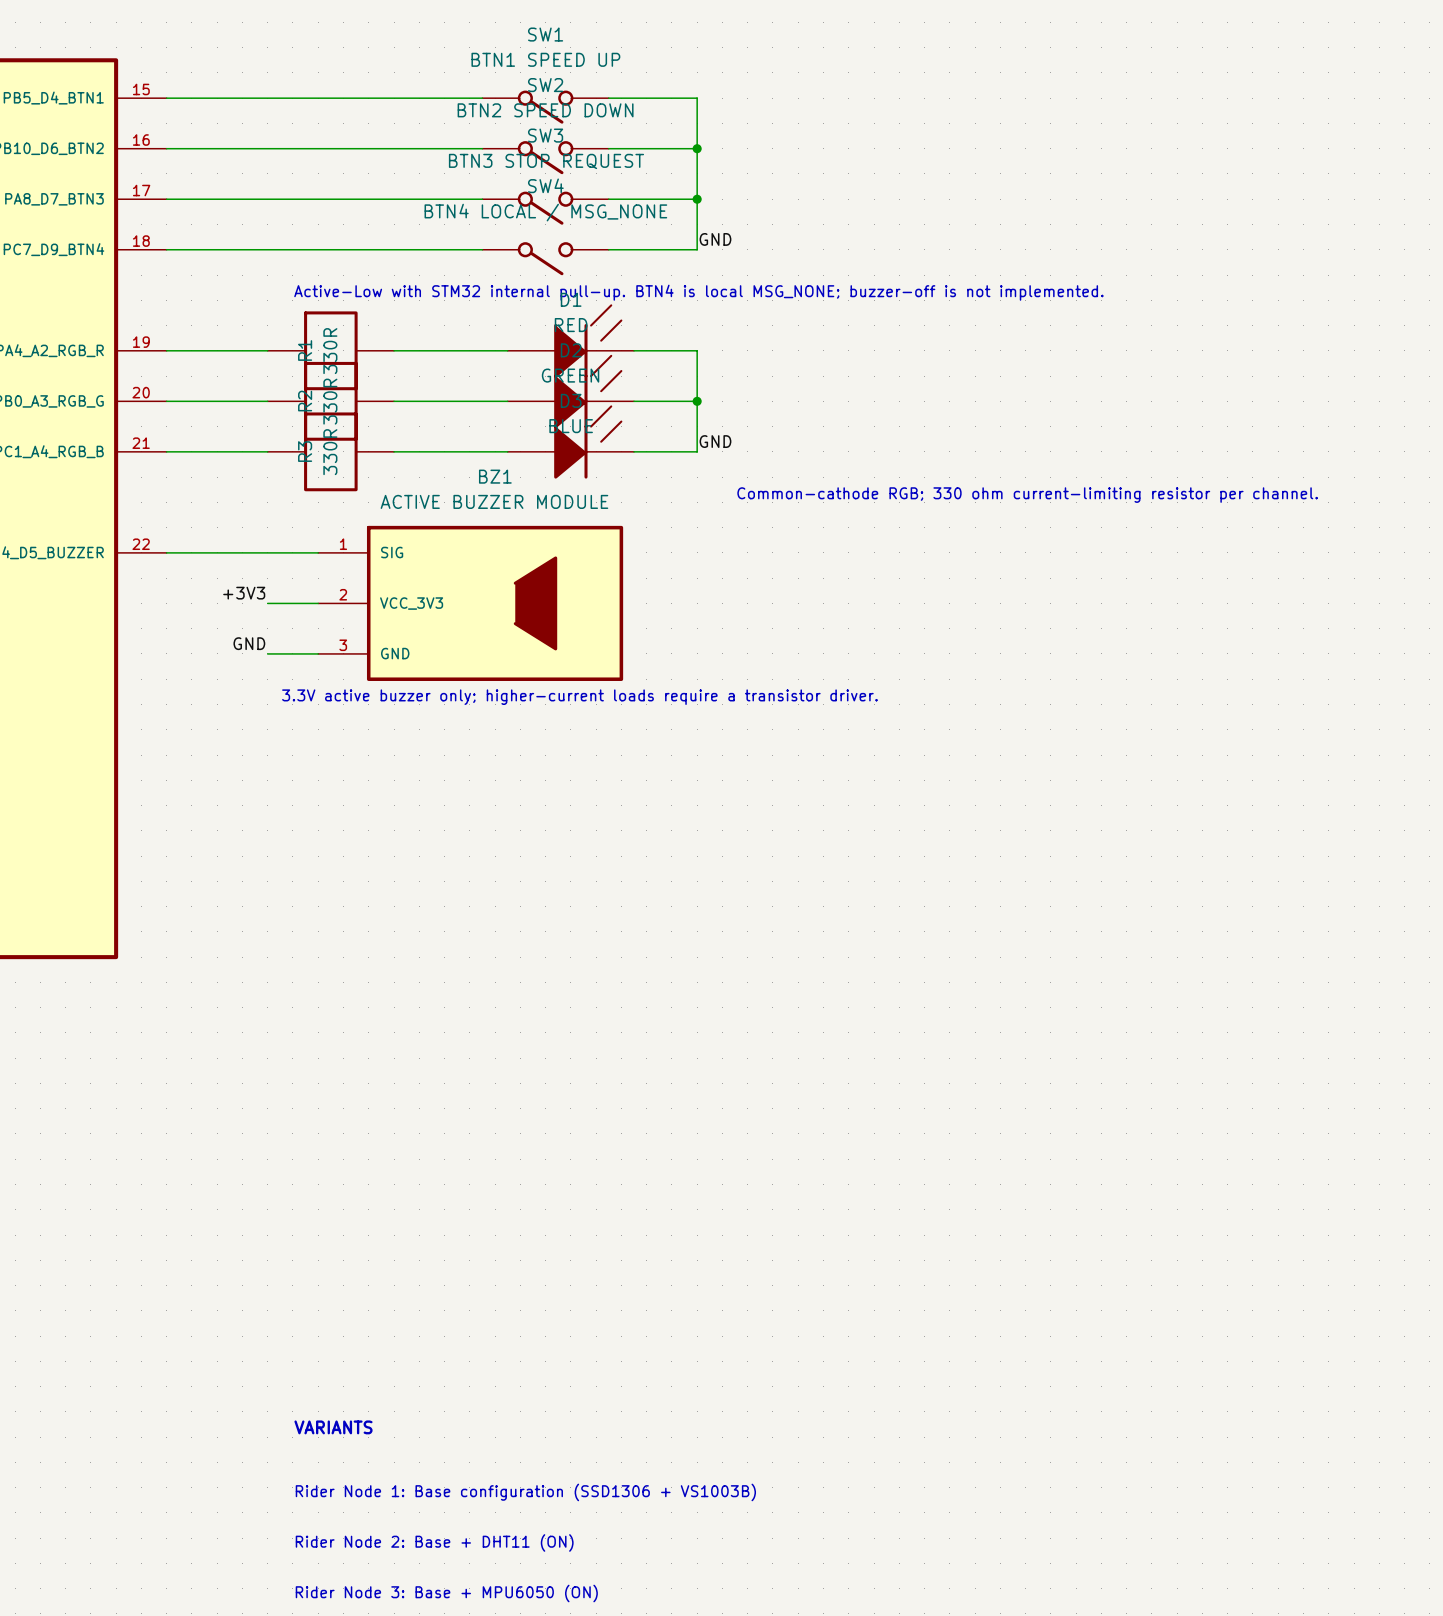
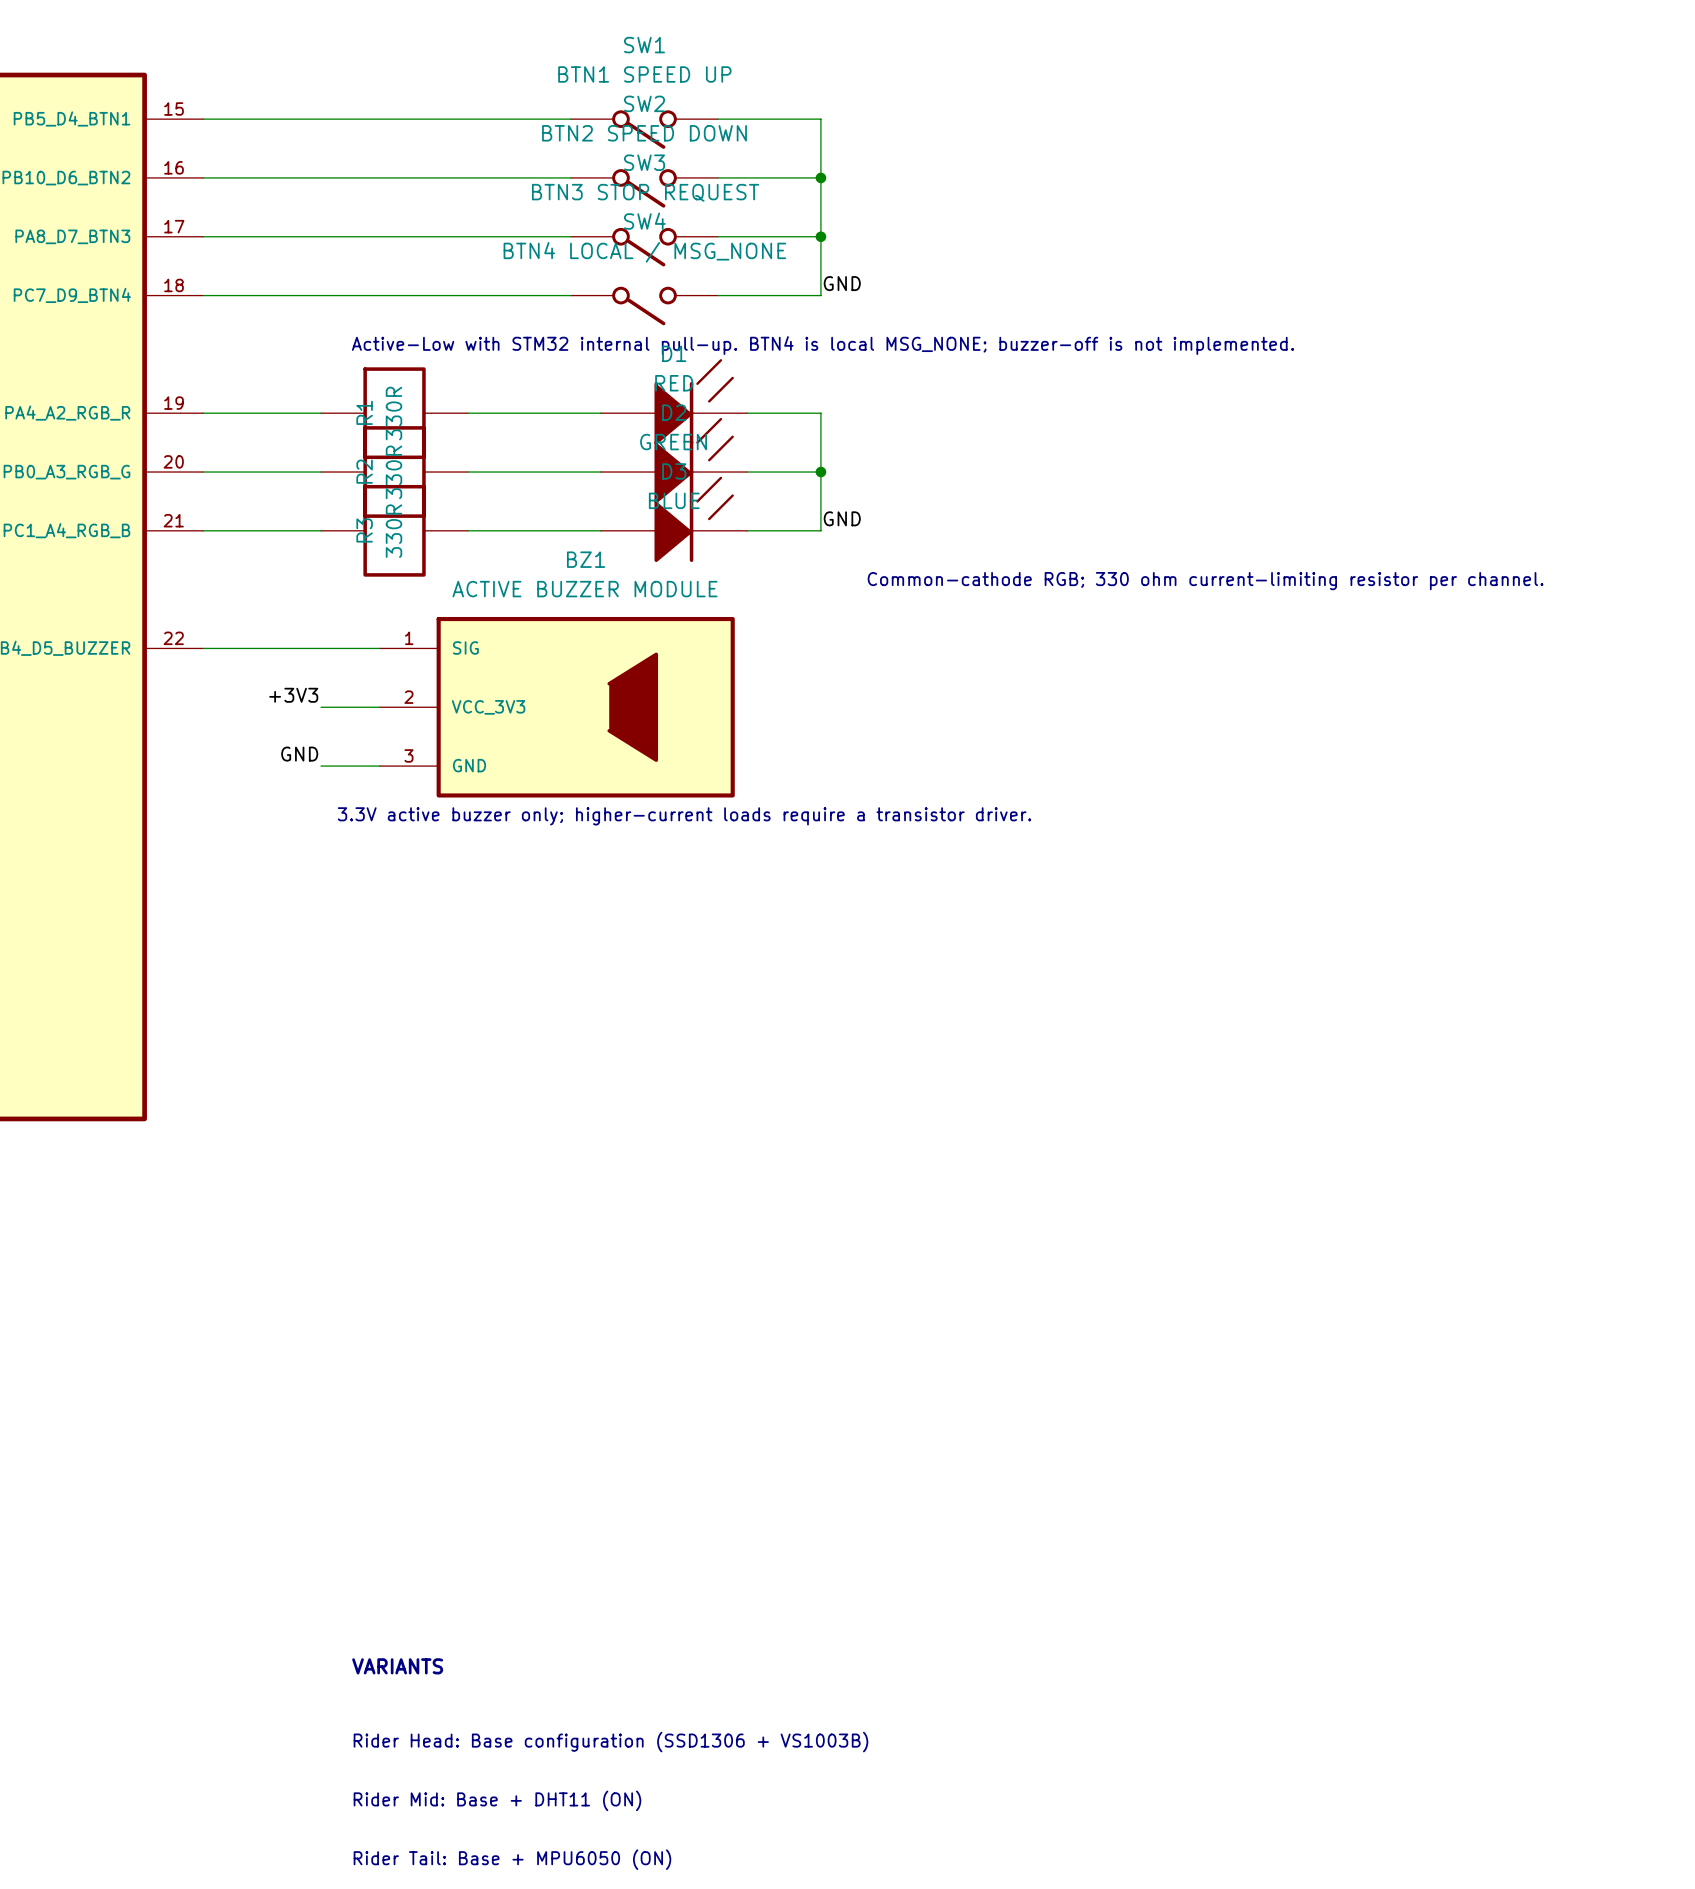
text: Rider Node 1: Base configuration (SSD1306 + VS1003B) (525, 1492) -> Rider Head: Base configuration (SSD1306 + VS1003B) (610, 1742)
text: Rider Node 2: Base + DHT11 (ON) (434, 1542) -> Rider Mid: Base + DHT11 (ON) (497, 1800)
text: Rider Node 3: Base + MPU6050 (ON) (446, 1593) -> Rider Tail: Base + MPU6050 (ON) (512, 1859)

